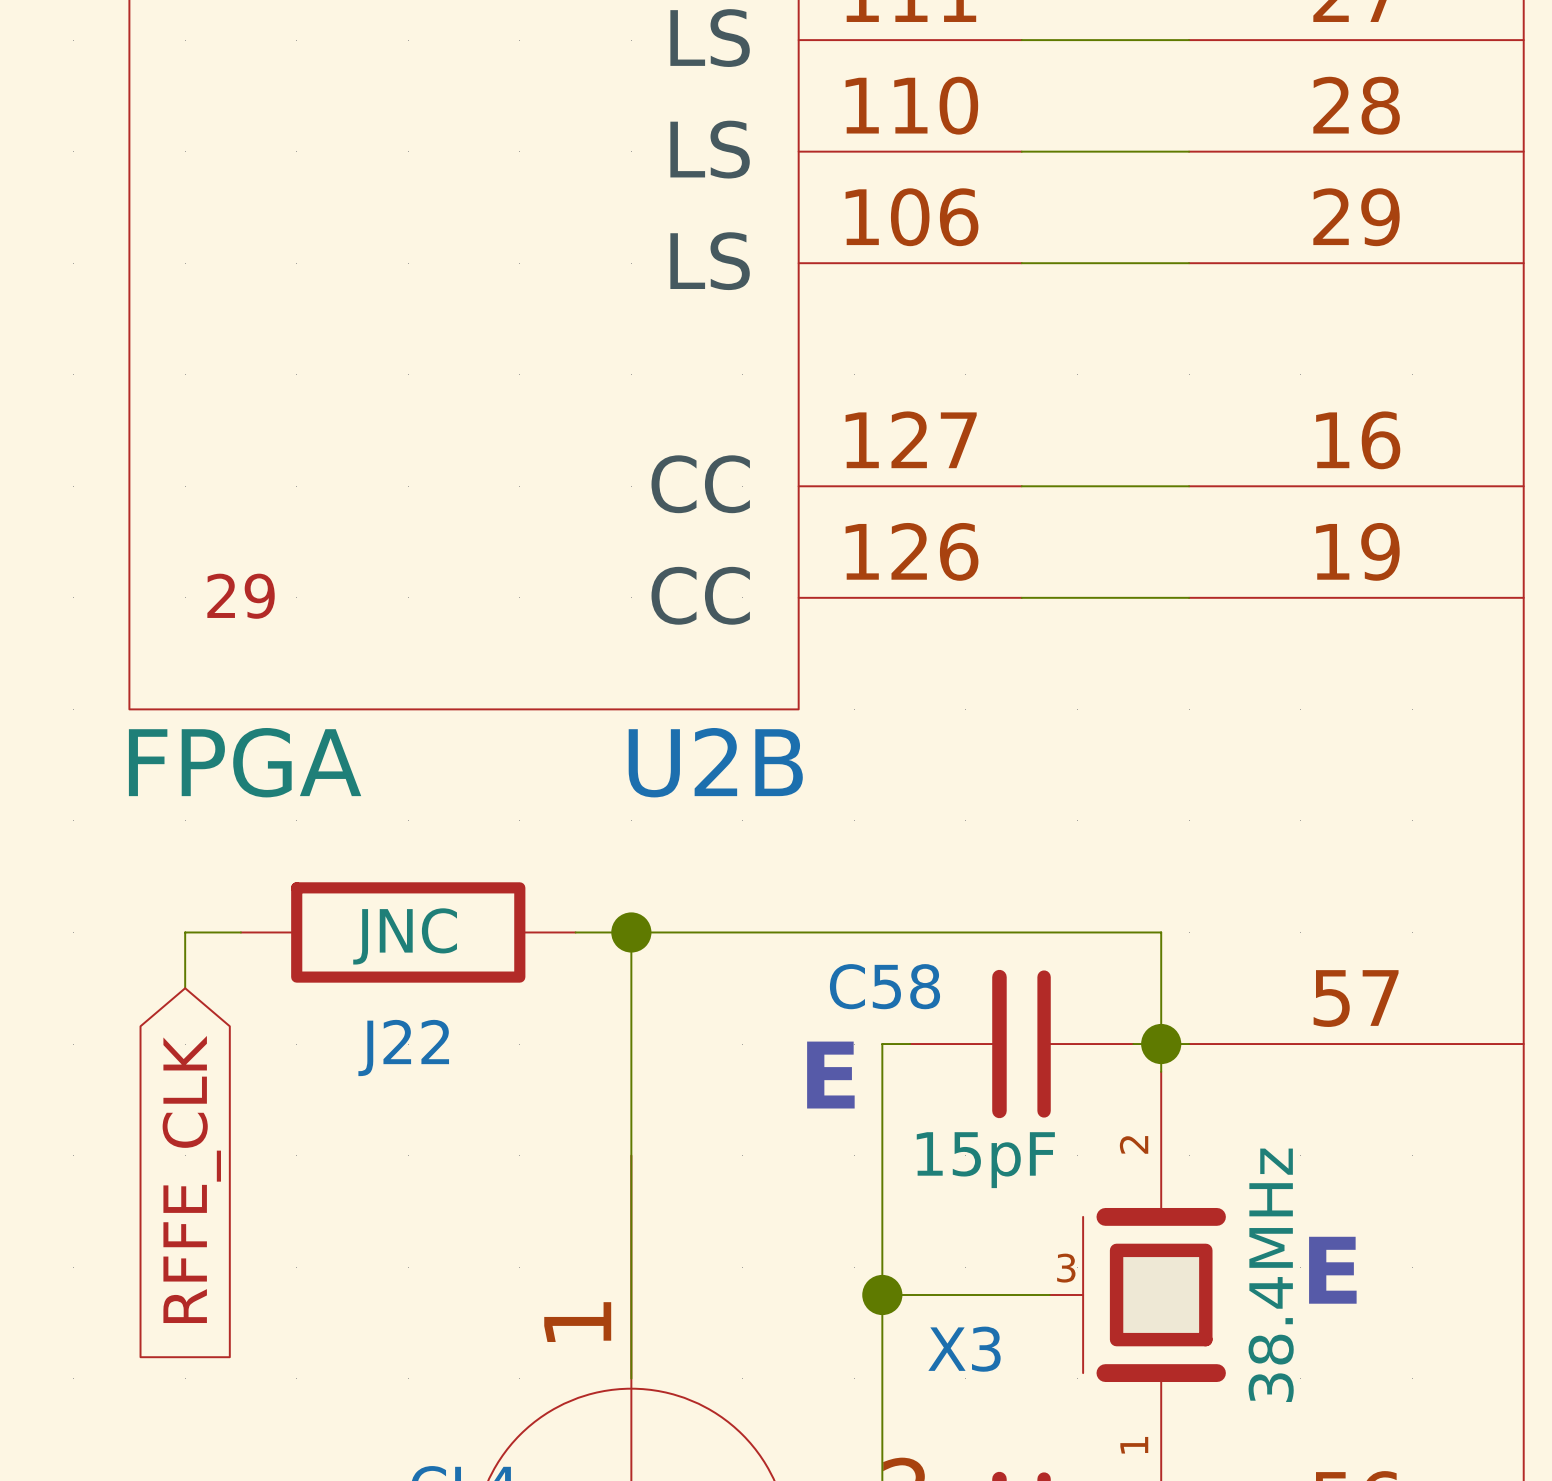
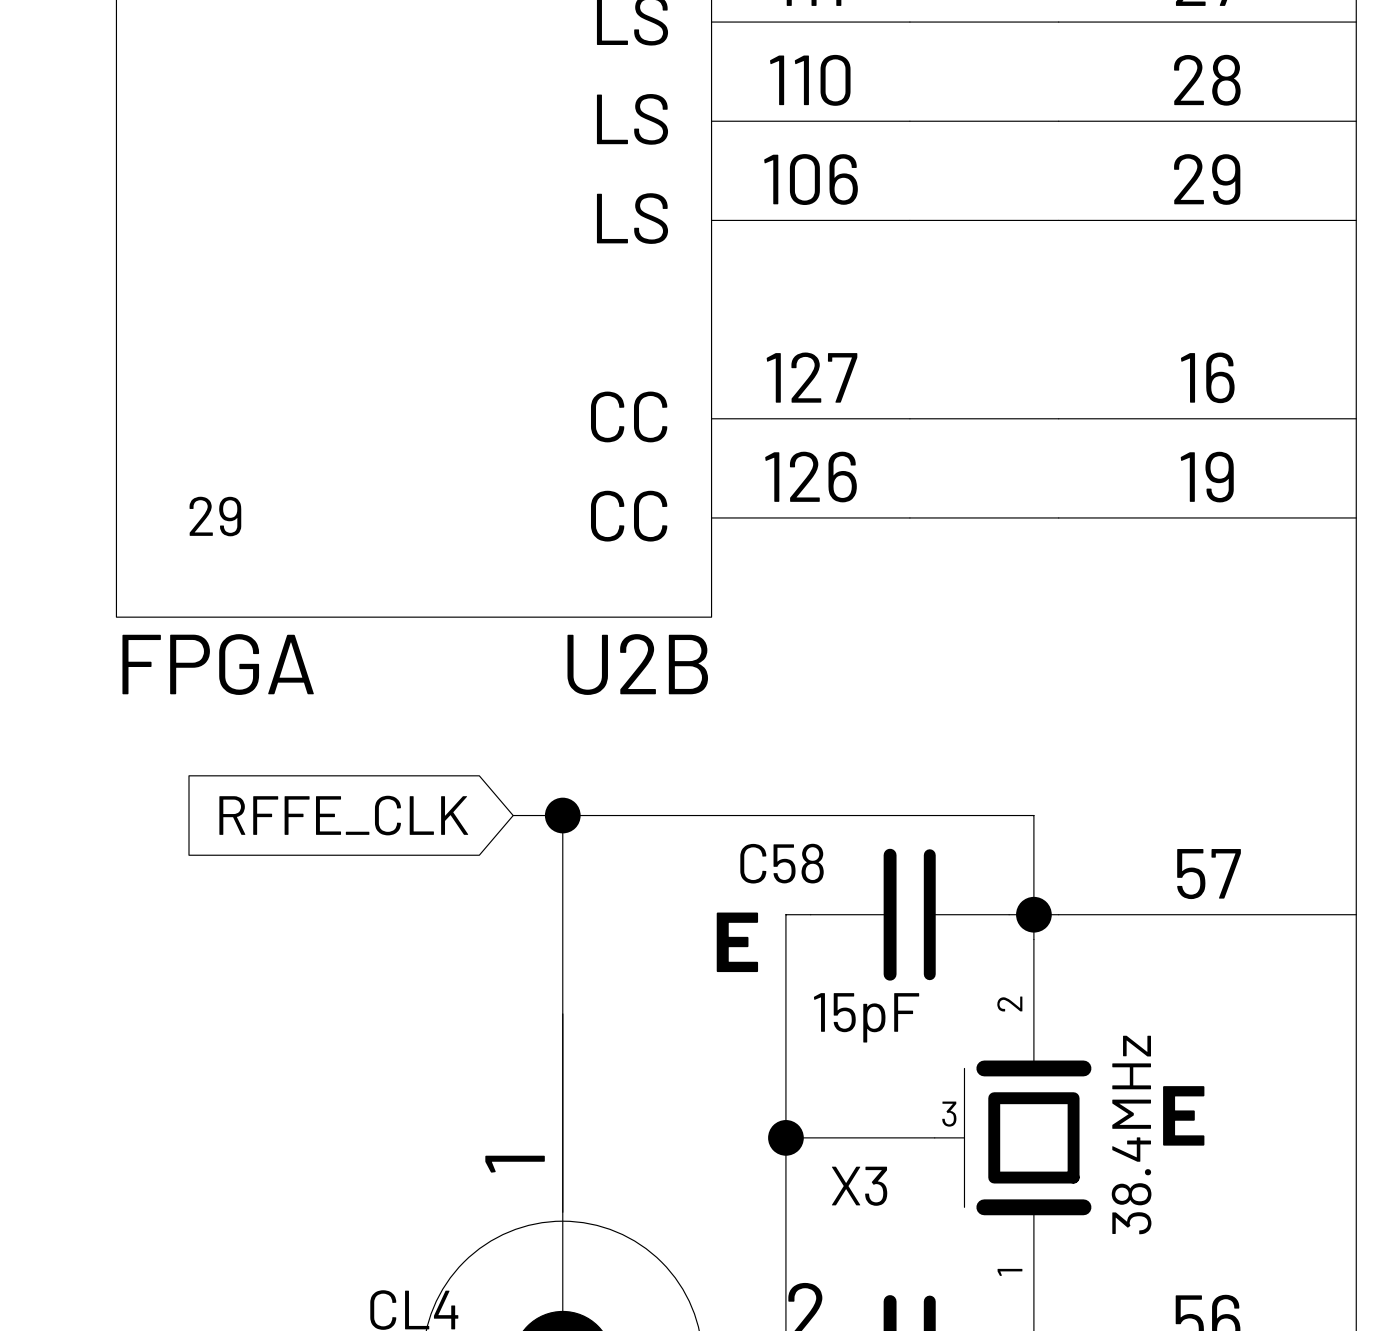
wire: (240, 932) (185, 932) (185, 988) -> none
J22: JNC (408, 932) -> none
global label rotation: 0° (191, 1179) -> 90° clockwise (343, 815)

